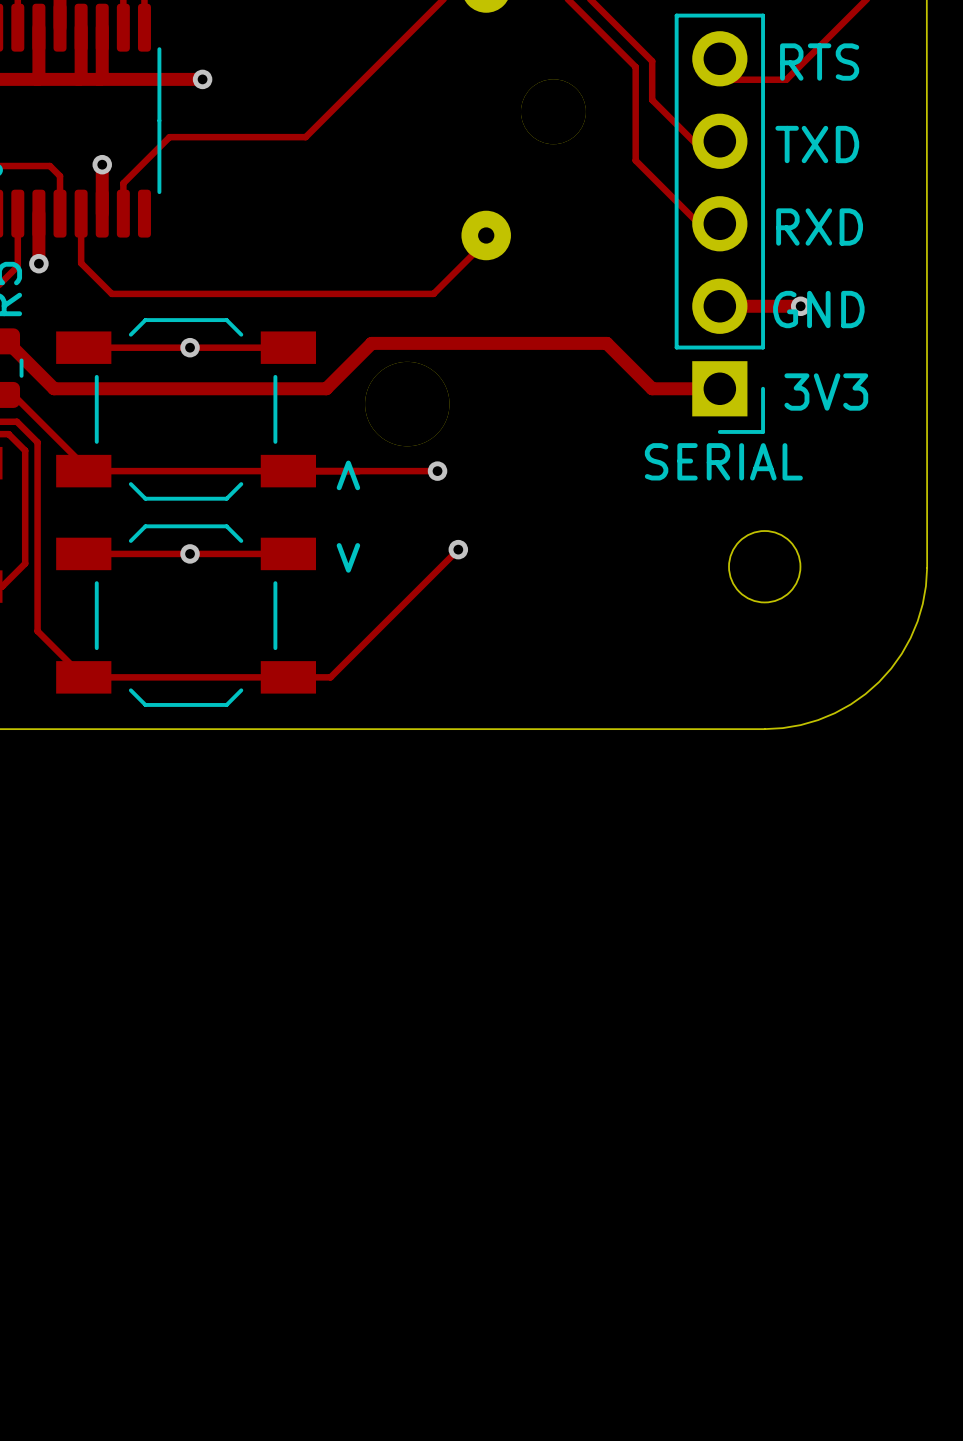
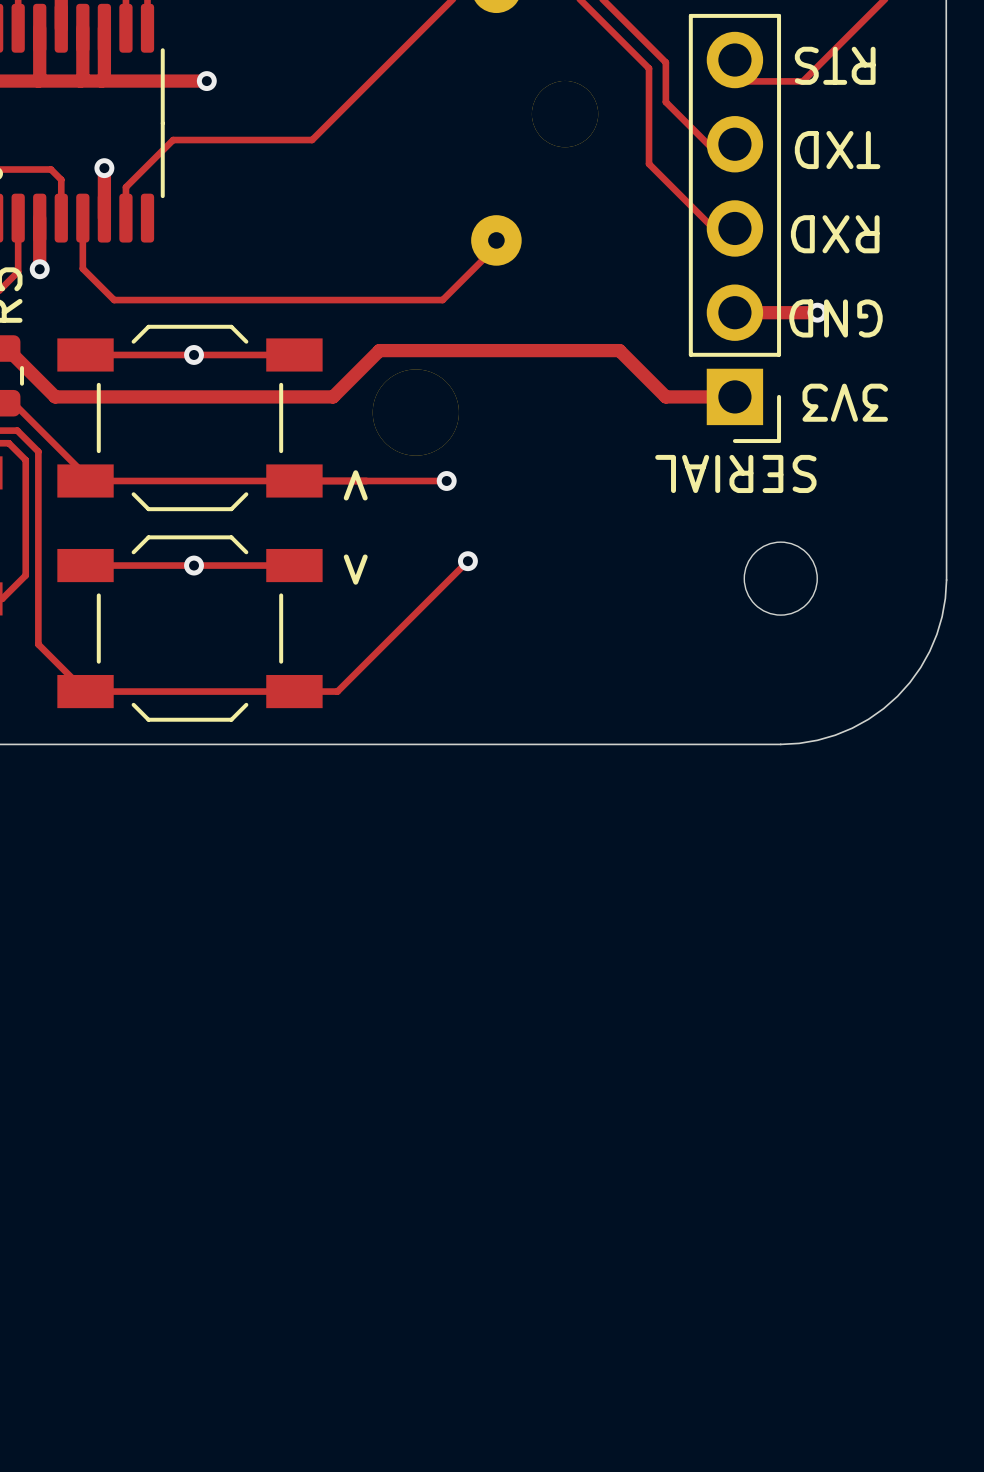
text rotation: 0° (819, 62) -> 180° (835, 65)
text rotation: 0° (817, 144) -> 180° (837, 150)
text rotation: 0° (819, 227) -> 180° (835, 234)
text rotation: 0° (818, 309) -> 180° (836, 318)
text rotation: 0° (826, 392) -> 180° (845, 402)
text rotation: 0° (723, 461) -> 180° (735, 473)

